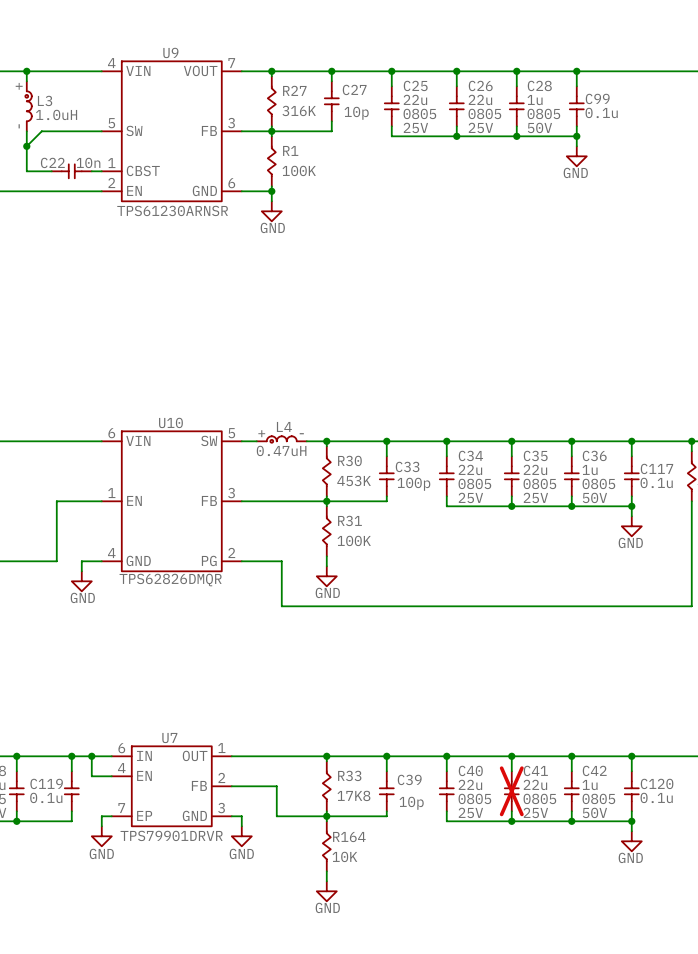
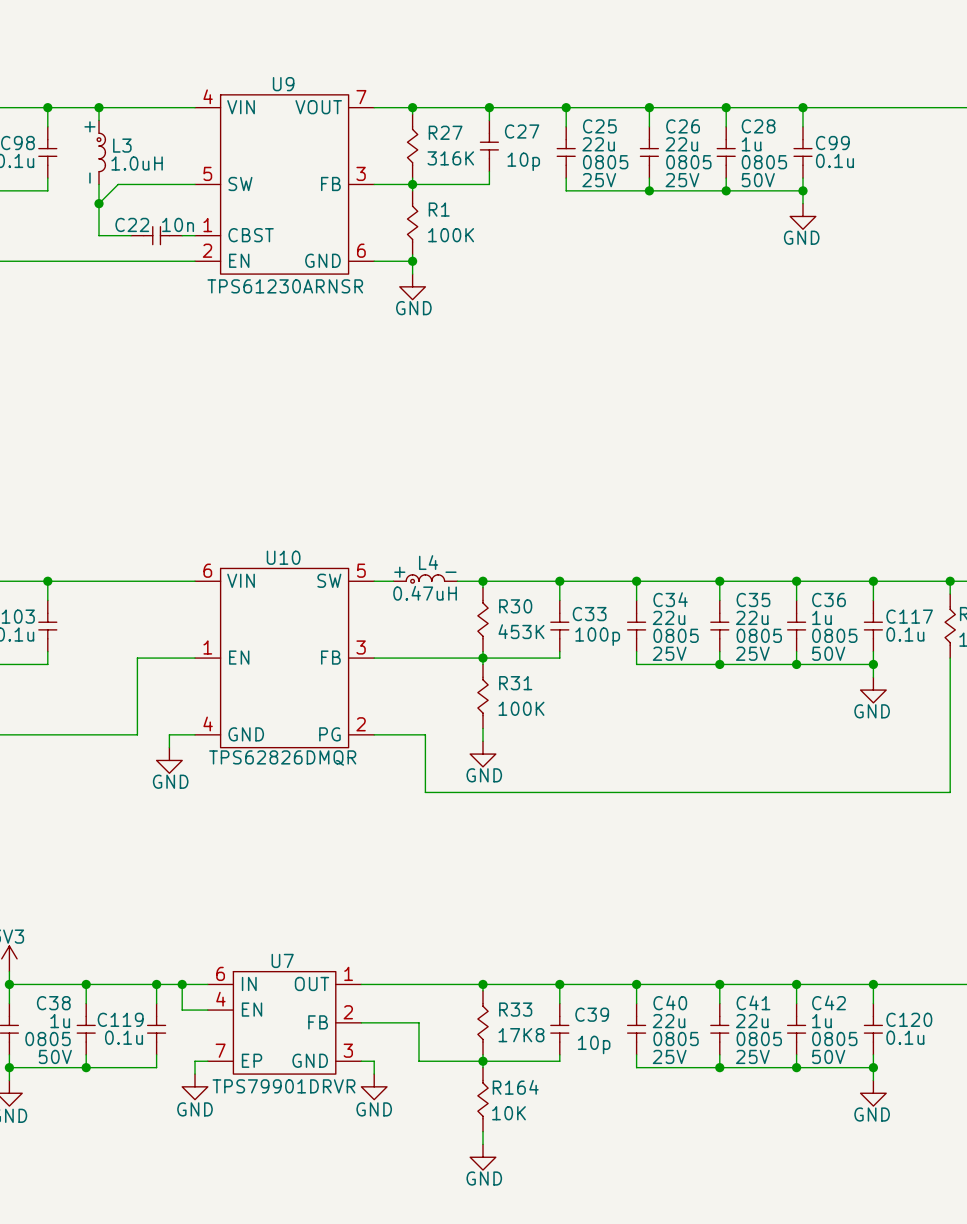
C41 do-not-place cross: (511, 791) -> none

